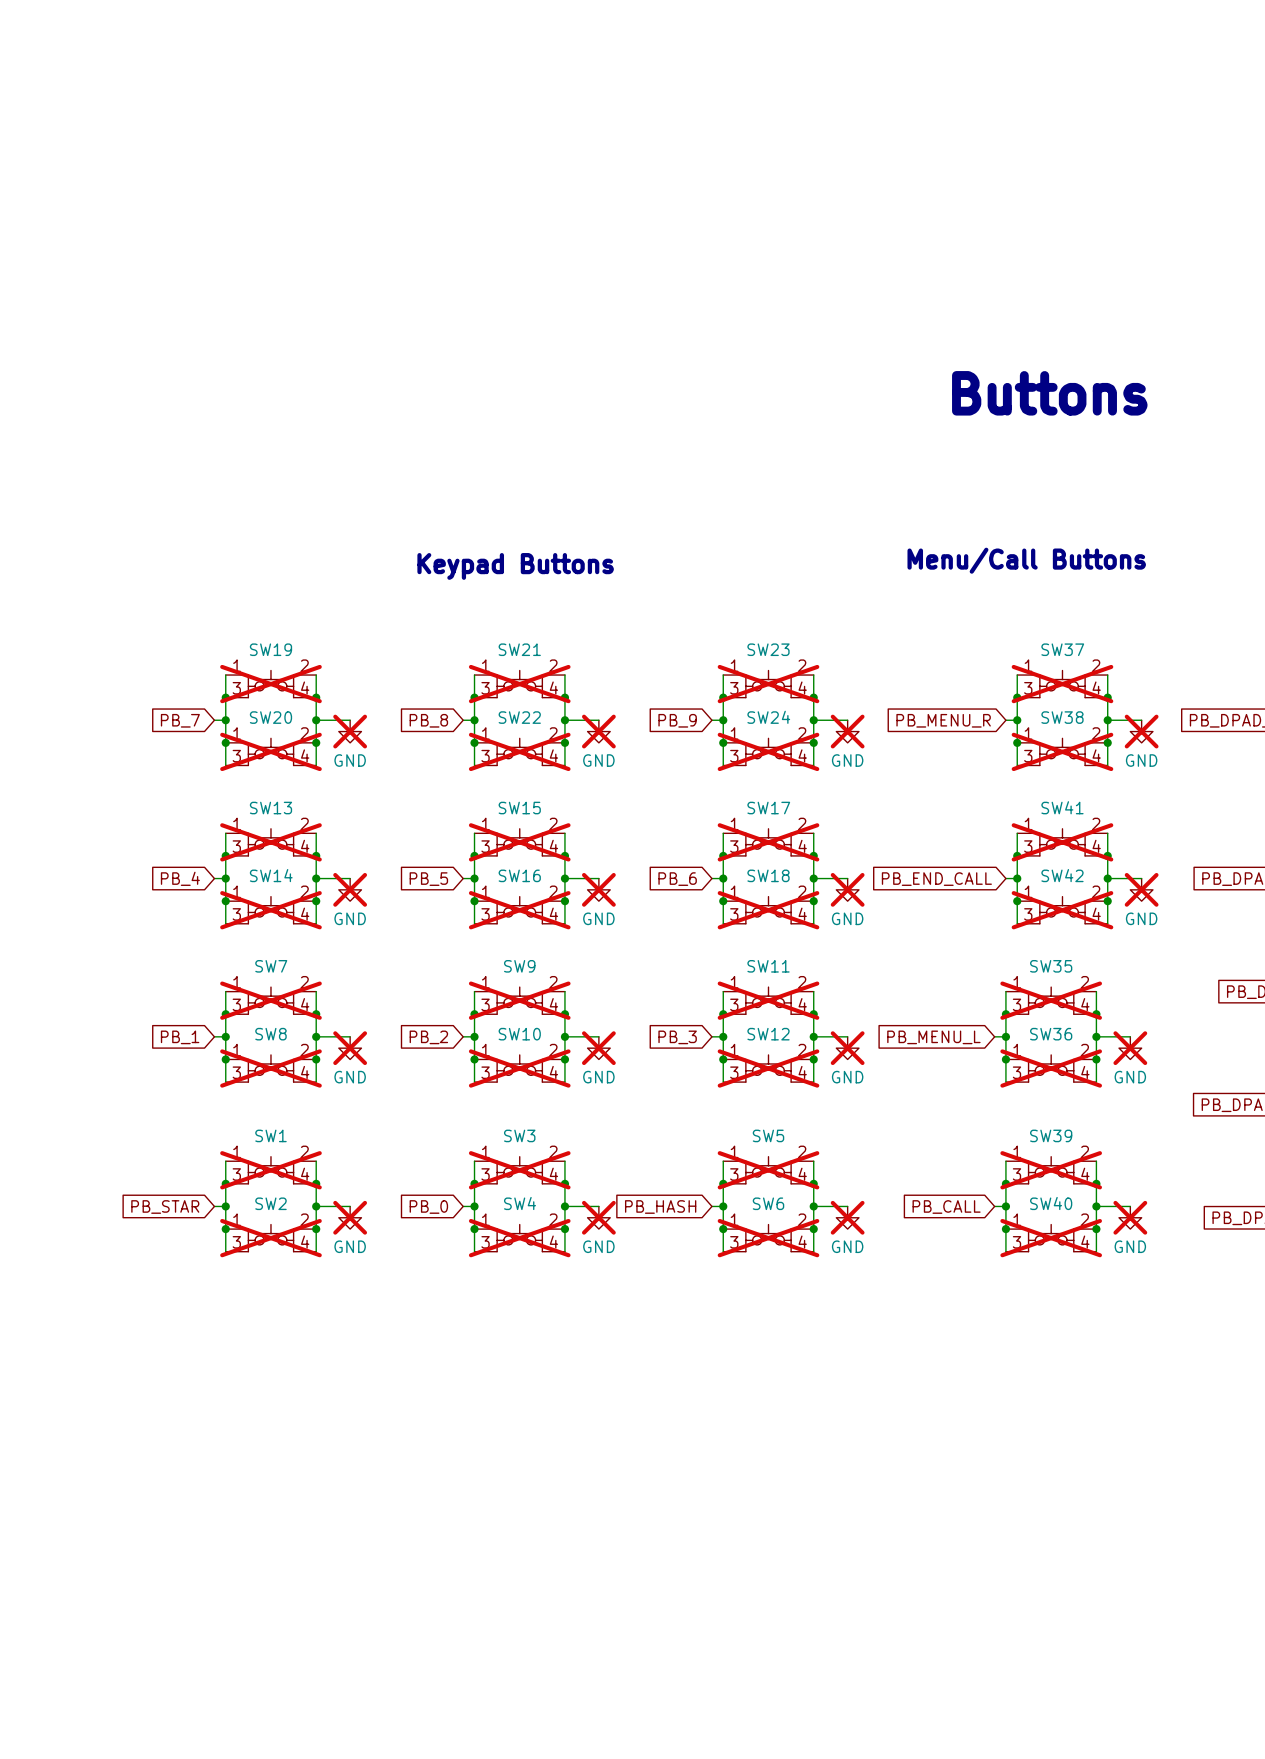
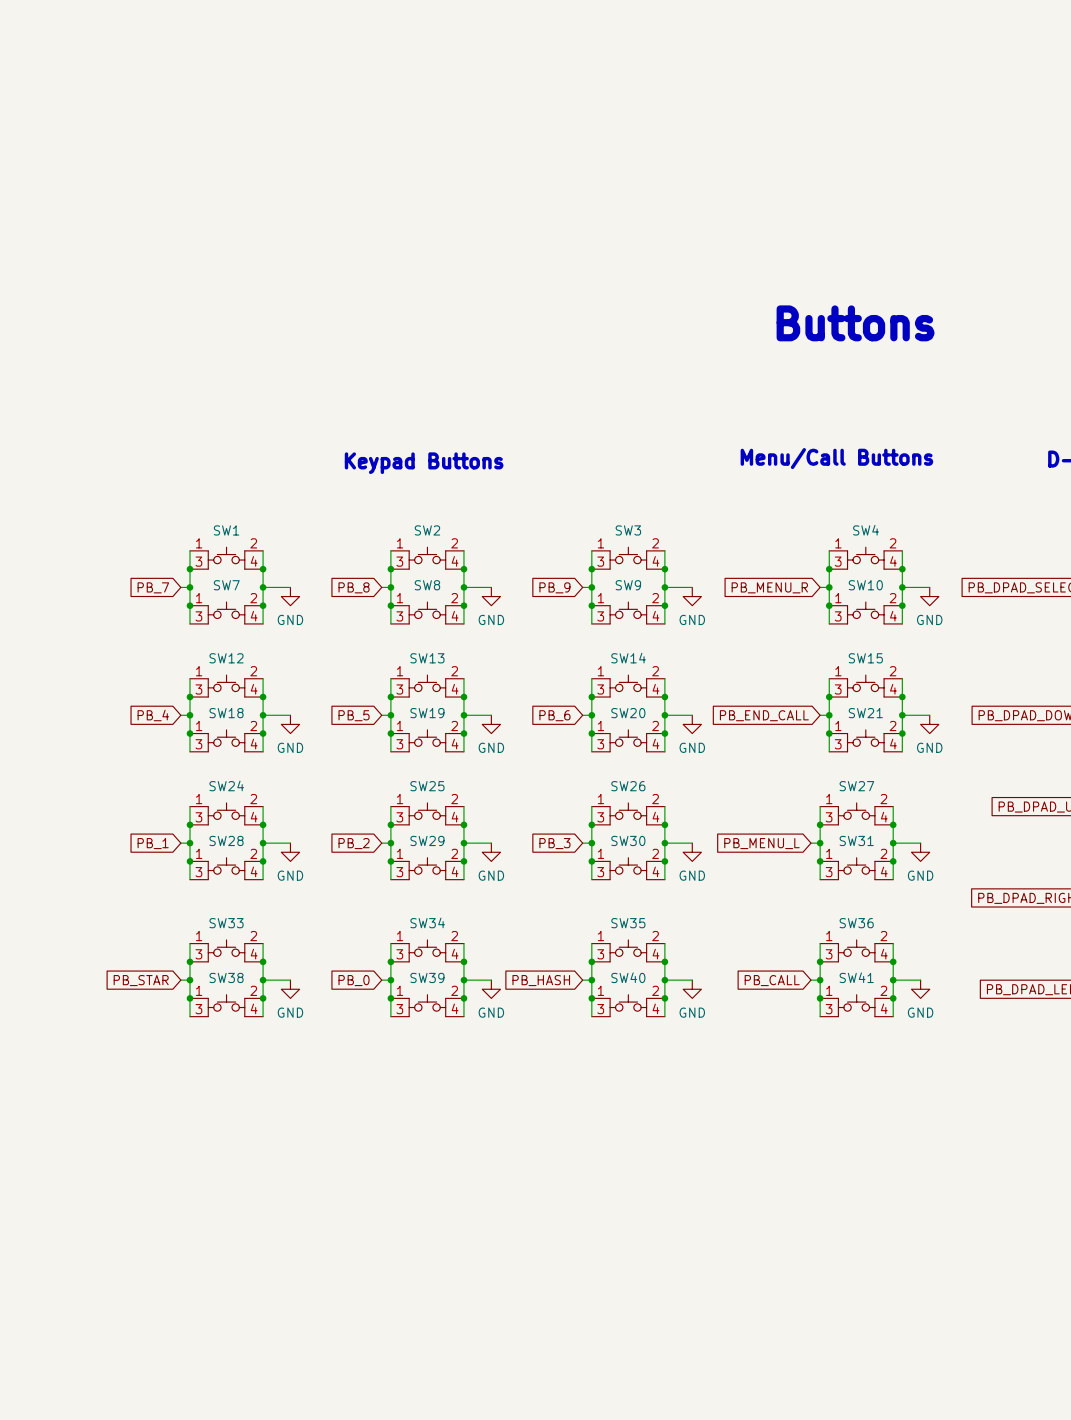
SW19 name: SW19 (270, 649) -> SW1 (226, 530)
SW21 name: SW21 (519, 649) -> SW2 (427, 530)
SW23 name: SW23 (768, 649) -> SW3 (628, 530)
SW37 name: SW37 (1062, 649) -> SW4 (866, 530)
SW19 do-not-place cross: (270, 684) -> none
SW21 do-not-place cross: (519, 684) -> none
SW23 do-not-place cross: (768, 684) -> none
SW37 do-not-place cross: (1062, 684) -> none
SW20 name: SW20 (270, 717) -> SW7 (226, 585)
SW22 name: SW22 (519, 717) -> SW8 (427, 585)
SW24 name: SW24 (768, 717) -> SW9 (628, 585)
SW38 name: SW38 (1062, 717) -> SW10 (865, 585)
power symbol do-not-place cross: (350, 731) -> none
power symbol do-not-place cross: (598, 731) -> none
power symbol do-not-place cross: (847, 731) -> none
power symbol do-not-place cross: (1141, 731) -> none
SW20 do-not-place cross: (270, 751) -> none
SW22 do-not-place cross: (519, 751) -> none
SW24 do-not-place cross: (768, 751) -> none
SW38 do-not-place cross: (1062, 751) -> none
SW41 name: SW41 (1062, 807) -> SW15 (865, 658)
SW13 name: SW13 (270, 808) -> SW12 (226, 658)
SW15 name: SW15 (519, 808) -> SW13 (427, 658)
SW17 name: SW17 (768, 808) -> SW14 (628, 658)
SW13 do-not-place cross: (270, 842) -> none
SW15 do-not-place cross: (519, 842) -> none
SW17 do-not-place cross: (768, 842) -> none
SW41 do-not-place cross: (1062, 842) -> none
SW14 name: SW14 (271, 875) -> SW18 (226, 713)
SW16 name: SW16 (519, 875) -> SW19 (427, 713)
SW18 name: SW18 (768, 875) -> SW20 (628, 713)
SW42 name: SW42 (1062, 875) -> SW21 (865, 713)
power symbol do-not-place cross: (350, 889) -> none
power symbol do-not-place cross: (598, 889) -> none
power symbol do-not-place cross: (847, 889) -> none
power symbol do-not-place cross: (1141, 889) -> none
SW14 do-not-place cross: (270, 910) -> none
SW16 do-not-place cross: (519, 910) -> none
SW18 do-not-place cross: (768, 910) -> none
SW42 do-not-place cross: (1062, 910) -> none
SW7 name: SW7 (271, 966) -> SW24 (226, 785)
SW9 name: SW9 (519, 966) -> SW25 (427, 786)
SW11 name: SW11 (768, 966) -> SW26 (628, 786)
SW35 name: SW35 (1051, 966) -> SW27 (856, 786)
SW7 do-not-place cross: (270, 1000) -> none
SW9 do-not-place cross: (519, 1000) -> none
SW11 do-not-place cross: (768, 1000) -> none
SW35 do-not-place cross: (1051, 1000) -> none
SW8 name: SW8 (270, 1034) -> SW28 (226, 840)
SW10 name: SW10 (519, 1034) -> SW29 (427, 840)
SW12 name: SW12 (768, 1034) -> SW30 (628, 840)
SW36 name: SW36 (1051, 1034) -> SW31 (856, 840)
power symbol do-not-place cross: (350, 1048) -> none
power symbol do-not-place cross: (598, 1048) -> none
power symbol do-not-place cross: (847, 1048) -> none
power symbol do-not-place cross: (1130, 1048) -> none
SW8 do-not-place cross: (270, 1068) -> none
SW10 do-not-place cross: (519, 1068) -> none
SW12 do-not-place cross: (768, 1068) -> none
SW36 do-not-place cross: (1051, 1068) -> none
SW1 name: SW1 (270, 1135) -> SW33 (226, 923)
SW3 name: SW3 (519, 1135) -> SW34 (427, 922)
SW5 name: SW5 (768, 1135) -> SW35 (628, 923)
SW39 name: SW39 (1051, 1135) -> SW36 (856, 923)
SW1 do-not-place cross: (270, 1170) -> none
SW3 do-not-place cross: (519, 1170) -> none
SW5 do-not-place cross: (768, 1170) -> none
SW39 do-not-place cross: (1051, 1170) -> none
SW2 name: SW2 (270, 1203) -> SW38 (226, 977)
SW4 name: SW4 (520, 1203) -> SW39 (427, 977)
SW6 name: SW6 (768, 1203) -> SW40 (628, 977)
SW40 name: SW40 (1051, 1203) -> SW41 (856, 977)
power symbol do-not-place cross: (350, 1217) -> none
power symbol do-not-place cross: (598, 1217) -> none
power symbol do-not-place cross: (847, 1217) -> none
power symbol do-not-place cross: (1130, 1217) -> none
SW2 do-not-place cross: (270, 1238) -> none
SW4 do-not-place cross: (519, 1238) -> none
SW6 do-not-place cross: (768, 1238) -> none
SW40 do-not-place cross: (1051, 1238) -> none

